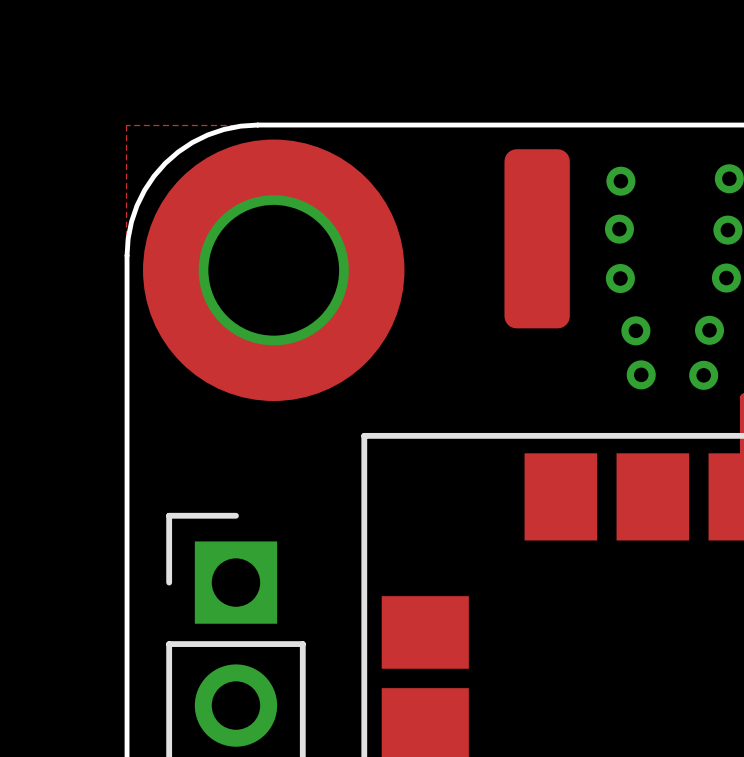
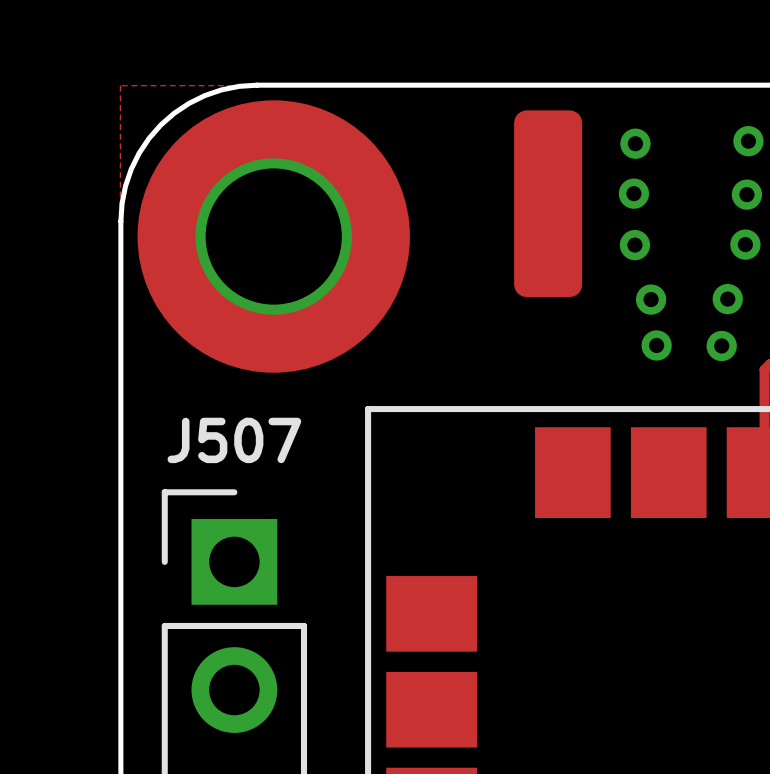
J507 name: none -> J507 (234, 440)

